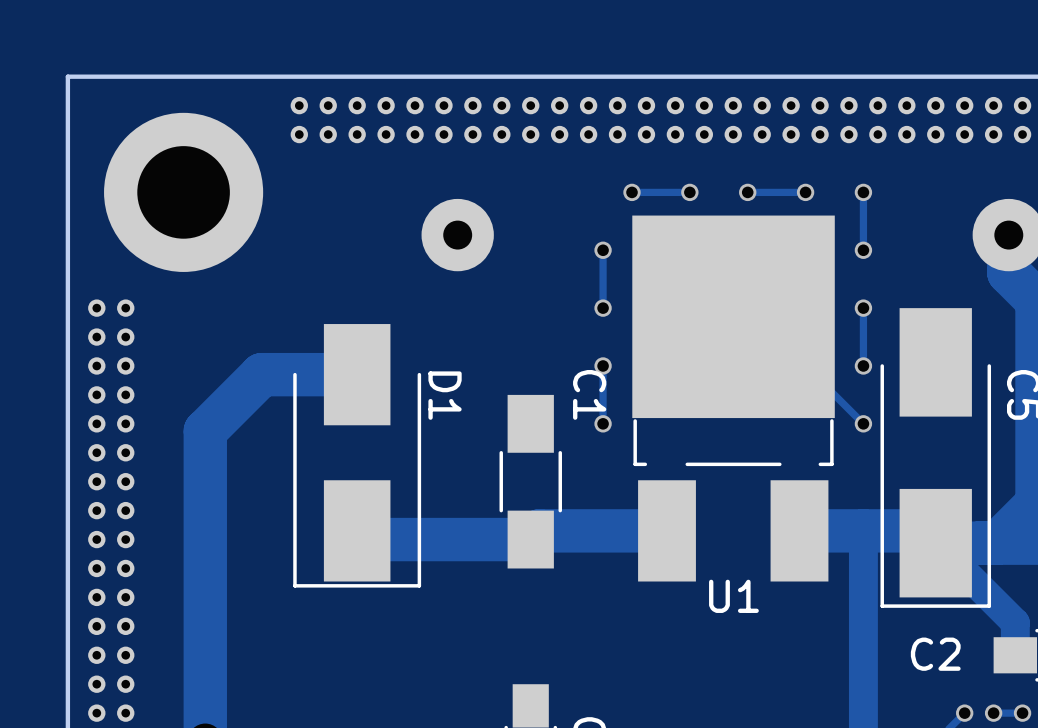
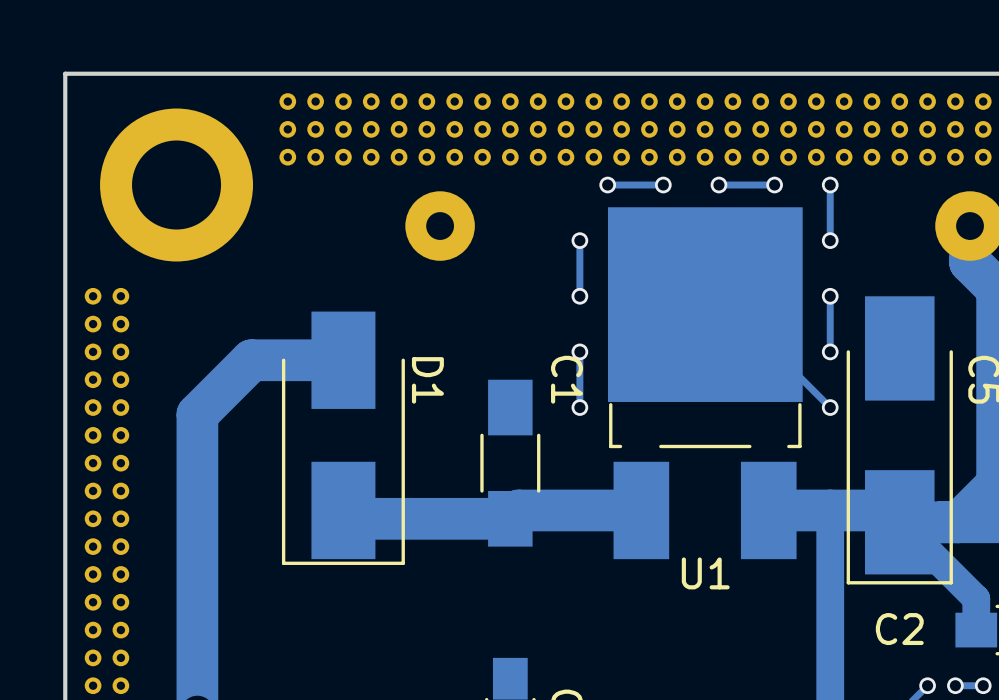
part: none -> (287, 157)
part: none -> (315, 157)
part: none -> (343, 157)
part: none -> (371, 157)
part: none -> (399, 157)
part: none -> (426, 157)
part: none -> (454, 157)
part: none -> (482, 157)
part: none -> (510, 157)
part: none -> (538, 157)
part: none -> (565, 157)
part: none -> (593, 157)
part: none -> (621, 157)
part: none -> (649, 157)
part: none -> (677, 157)
part: none -> (705, 157)
part: none -> (732, 157)
part: none -> (760, 157)
part: none -> (788, 157)
part: none -> (816, 157)
part: none -> (844, 157)
part: none -> (871, 157)
part: none -> (899, 157)
part: none -> (927, 157)
part: none -> (955, 157)
part: none -> (983, 157)

